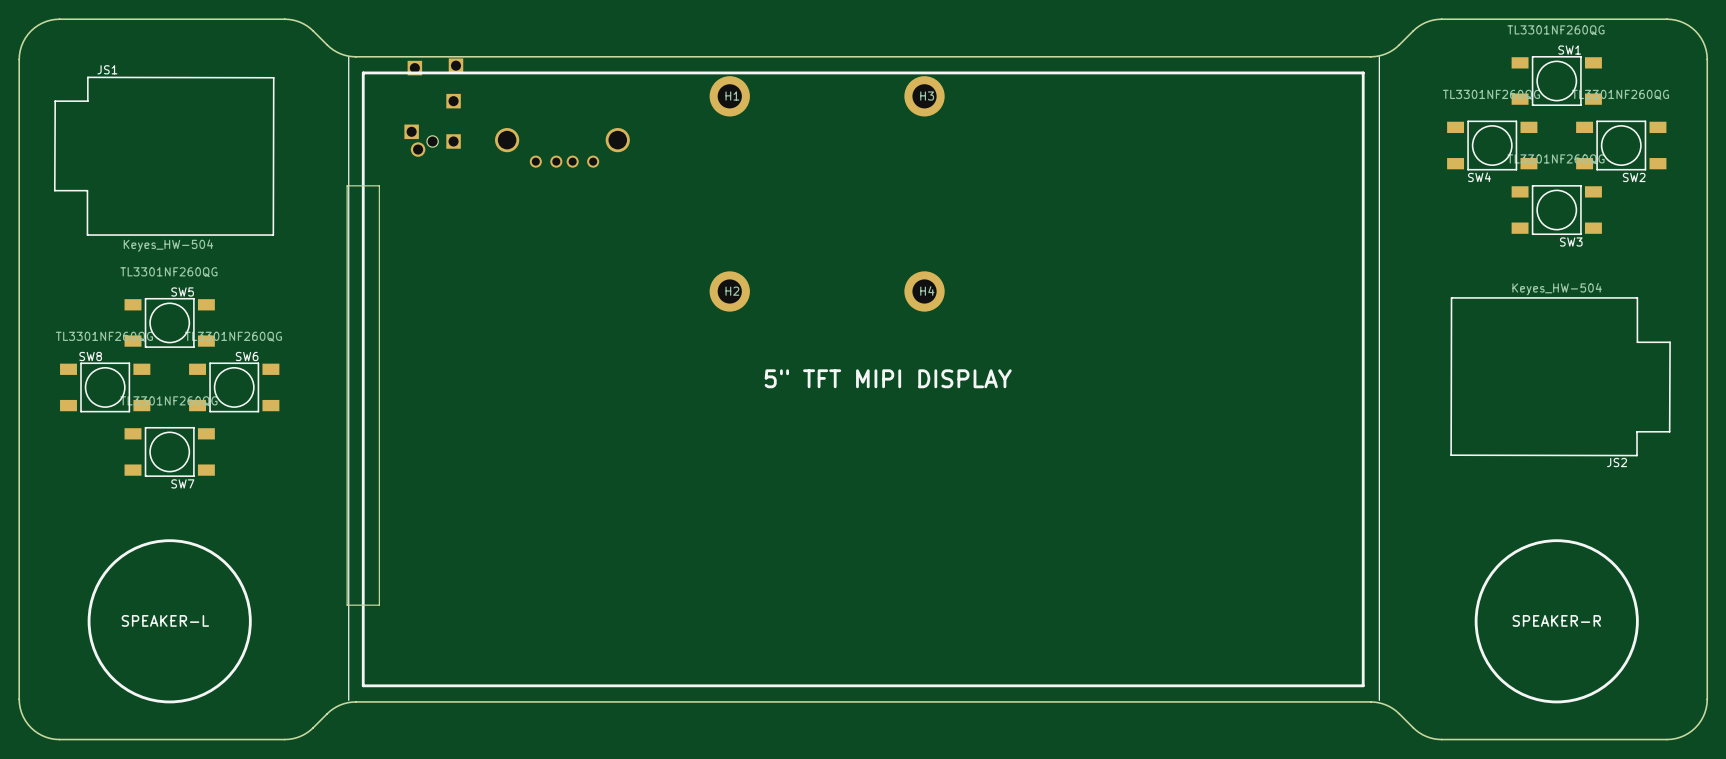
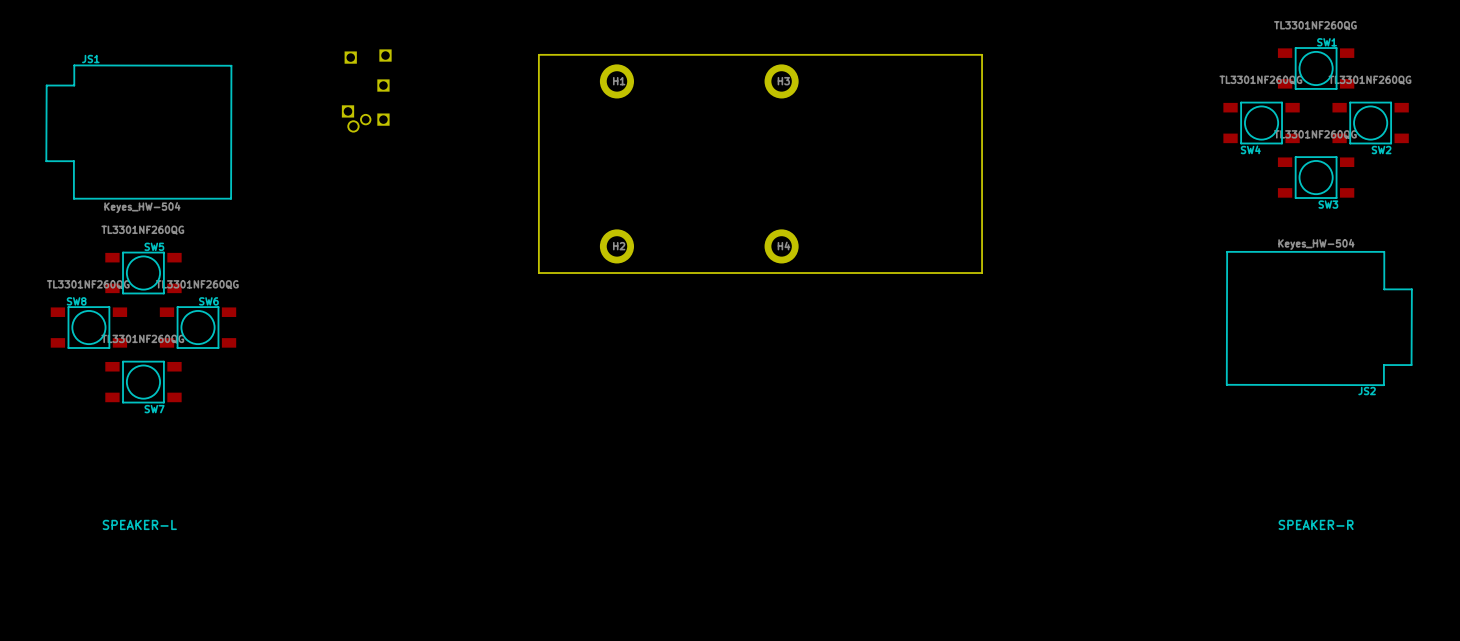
board edge: (59, 19) (288, 19) (307, 26) (336, 52) (355, 56) (1370, 56) (1389, 52) (1419, 26) (1437, 19) (1666, 19) (1684, 23) (1695, 31) (1701, 38) (1704, 46) (1707, 59) (1707, 699) (1703, 716) (1695, 727) (1688, 733) (1671, 739) (1441, 739) (1430, 737) (1419, 732) (1389, 706) (1370, 701) (355, 701) (336, 706) (307, 732) (288, 739) (59, 739) (42, 735) (31, 727) (25, 720) (21, 712) (19, 699) (19, 59) (21, 46) (31, 31) (46, 21) (59, 19) -> none
line: (348, 56) (348, 700) -> none
line: (1379, 56) (1379, 700) -> none
board edge: none -> (538, 54) (538, 273) (982, 273) (982, 54) (538, 54)
line: (363, 72) (1363, 72) (1363, 685) (363, 685) (363, 72) -> none
part: (562, 147) -> none
board edge: (347, 185) (347, 605) (379, 605) (379, 185) (347, 185) -> none
text: 5" TFT MIPI DISPLAY (888, 378) -> none
drawing: [87, 539, 252, 704] -> none
drawing: [1474, 539, 1639, 704] -> none

